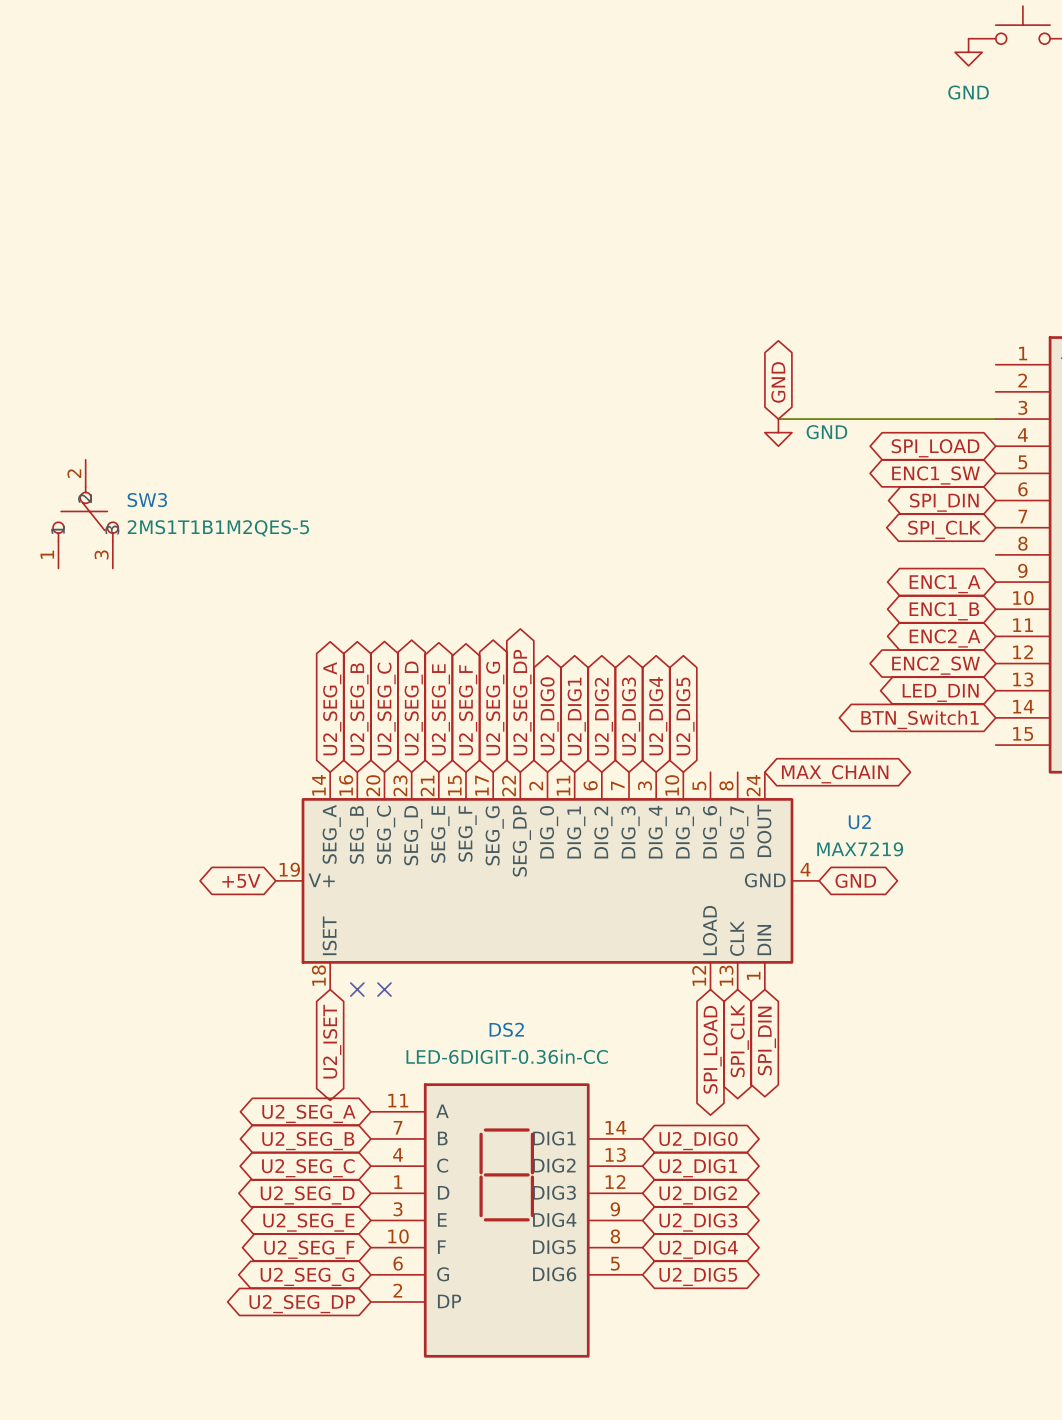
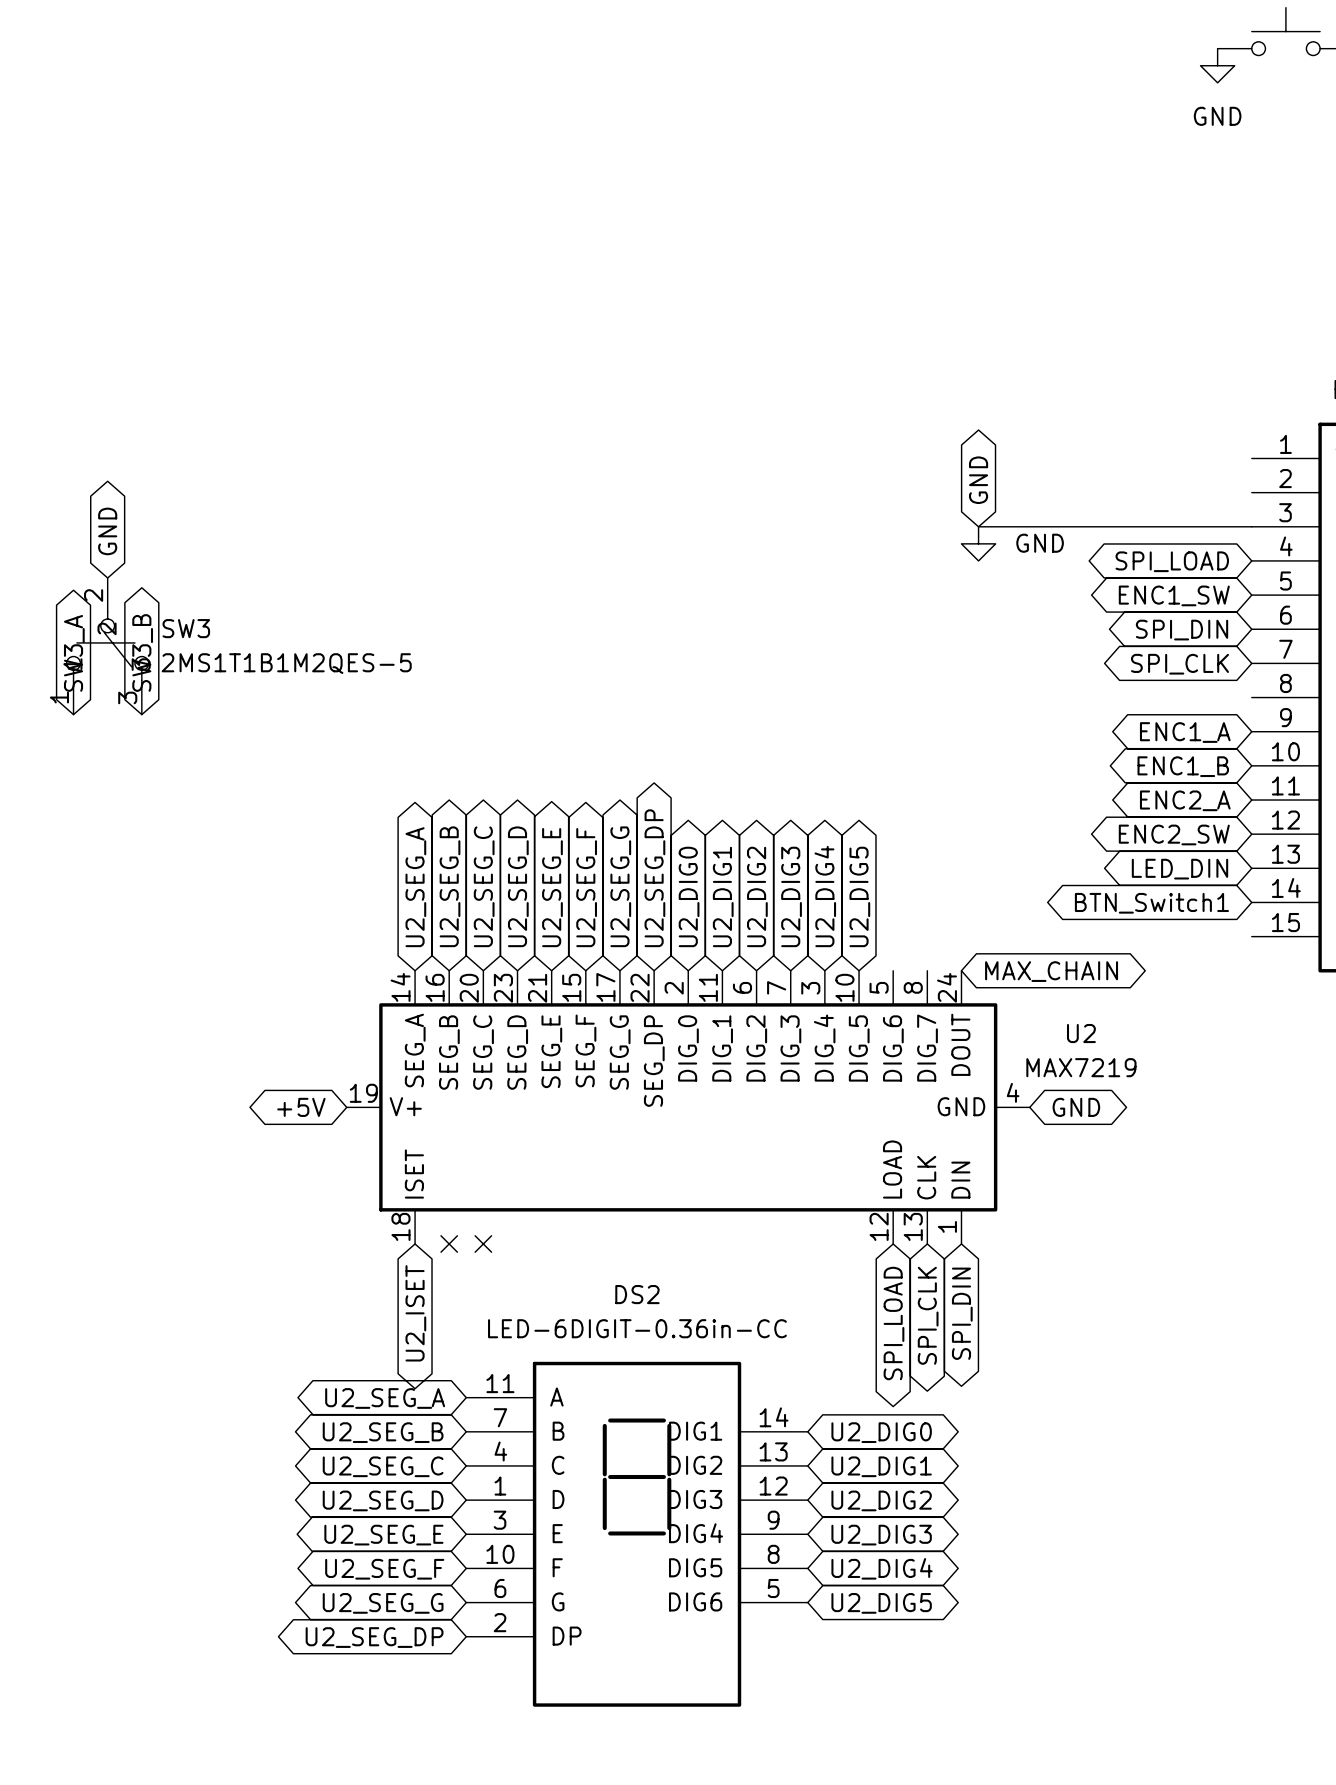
global label: none -> GND (107, 531)
global label: none -> SW3_A (74, 653)
global label: none -> SW3_B (142, 653)

